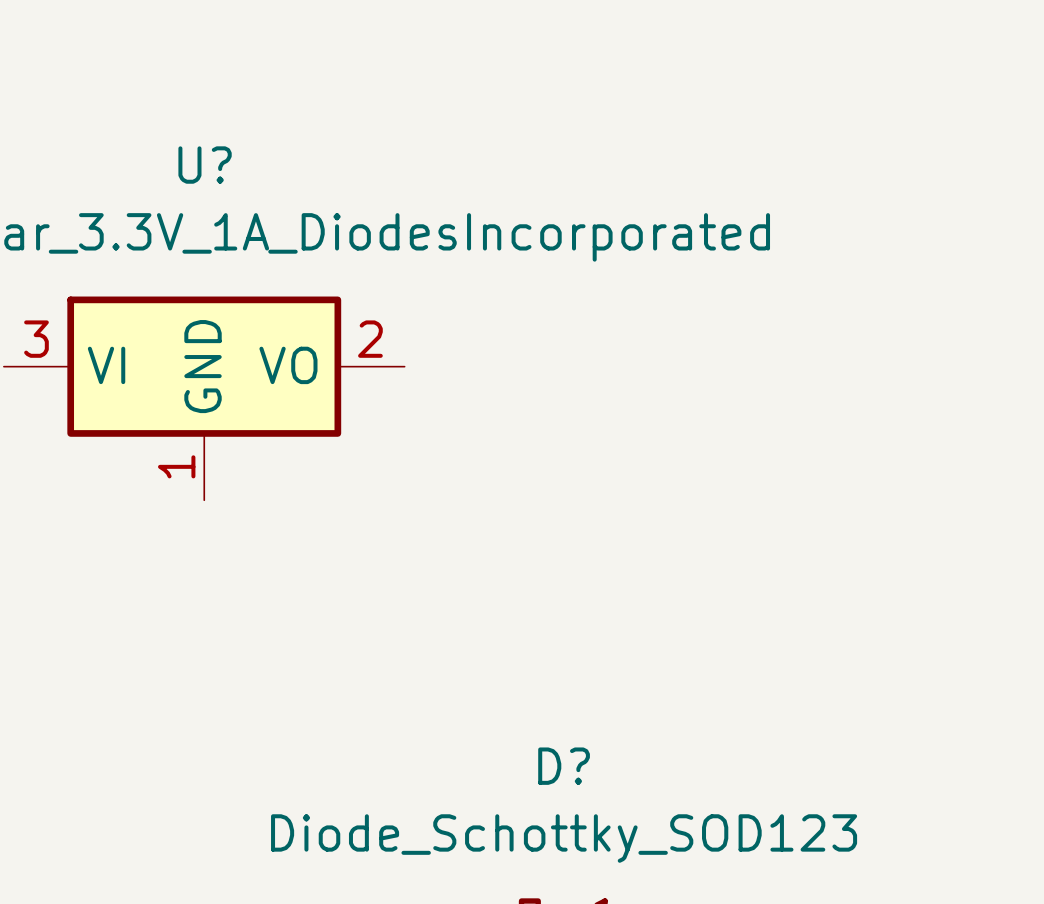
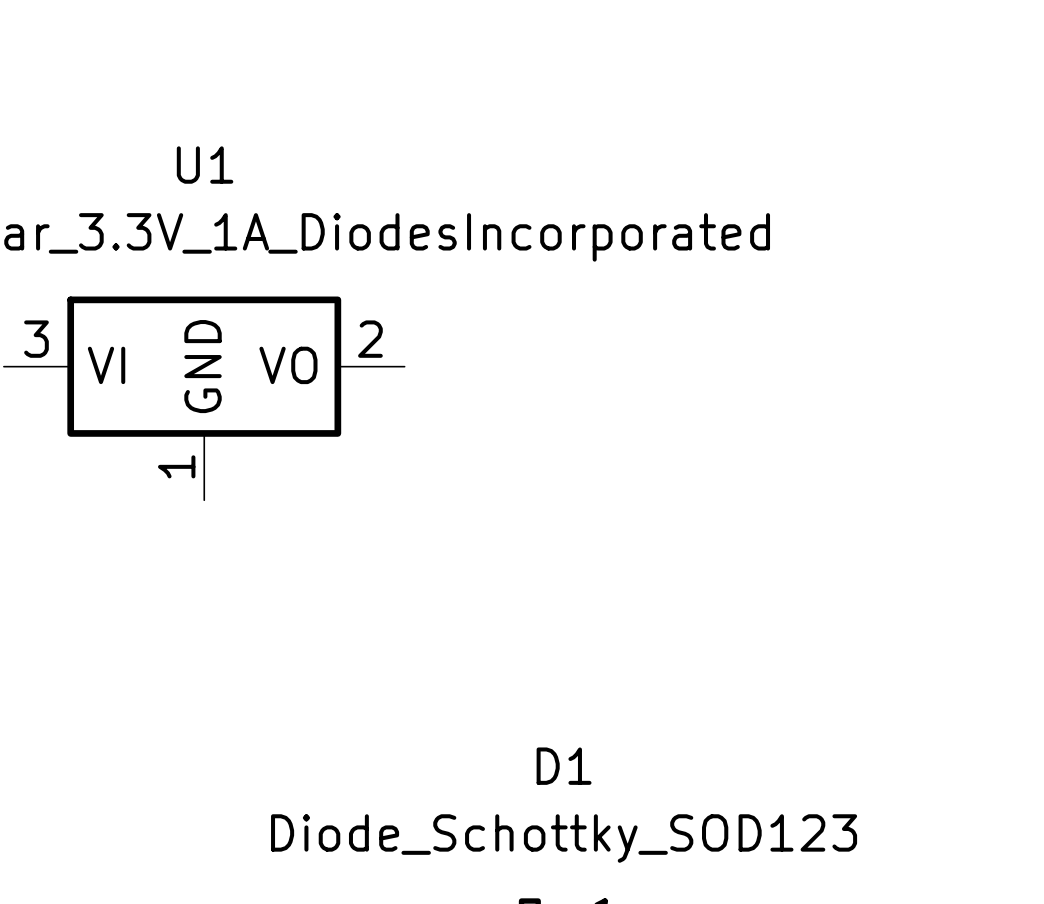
U? name: U? (205, 165) -> U1 (205, 165)
D? name: D? (564, 766) -> D1 (564, 766)

